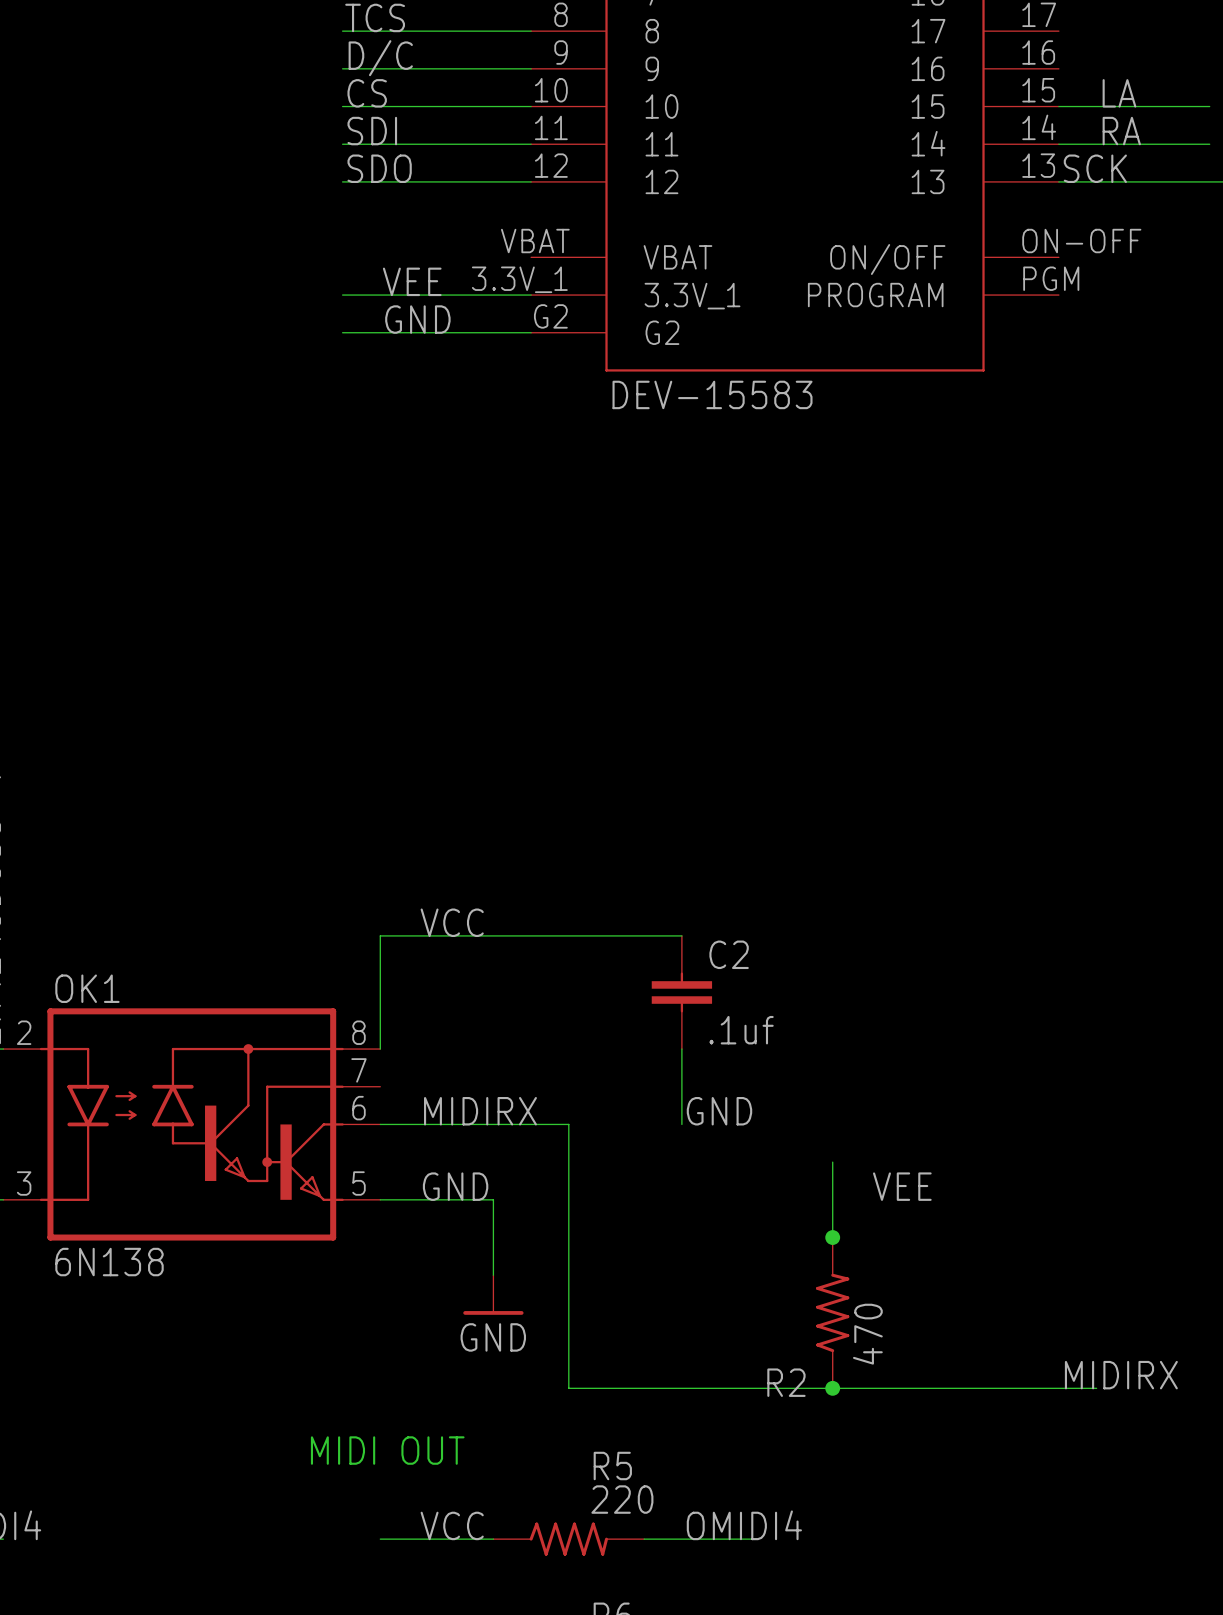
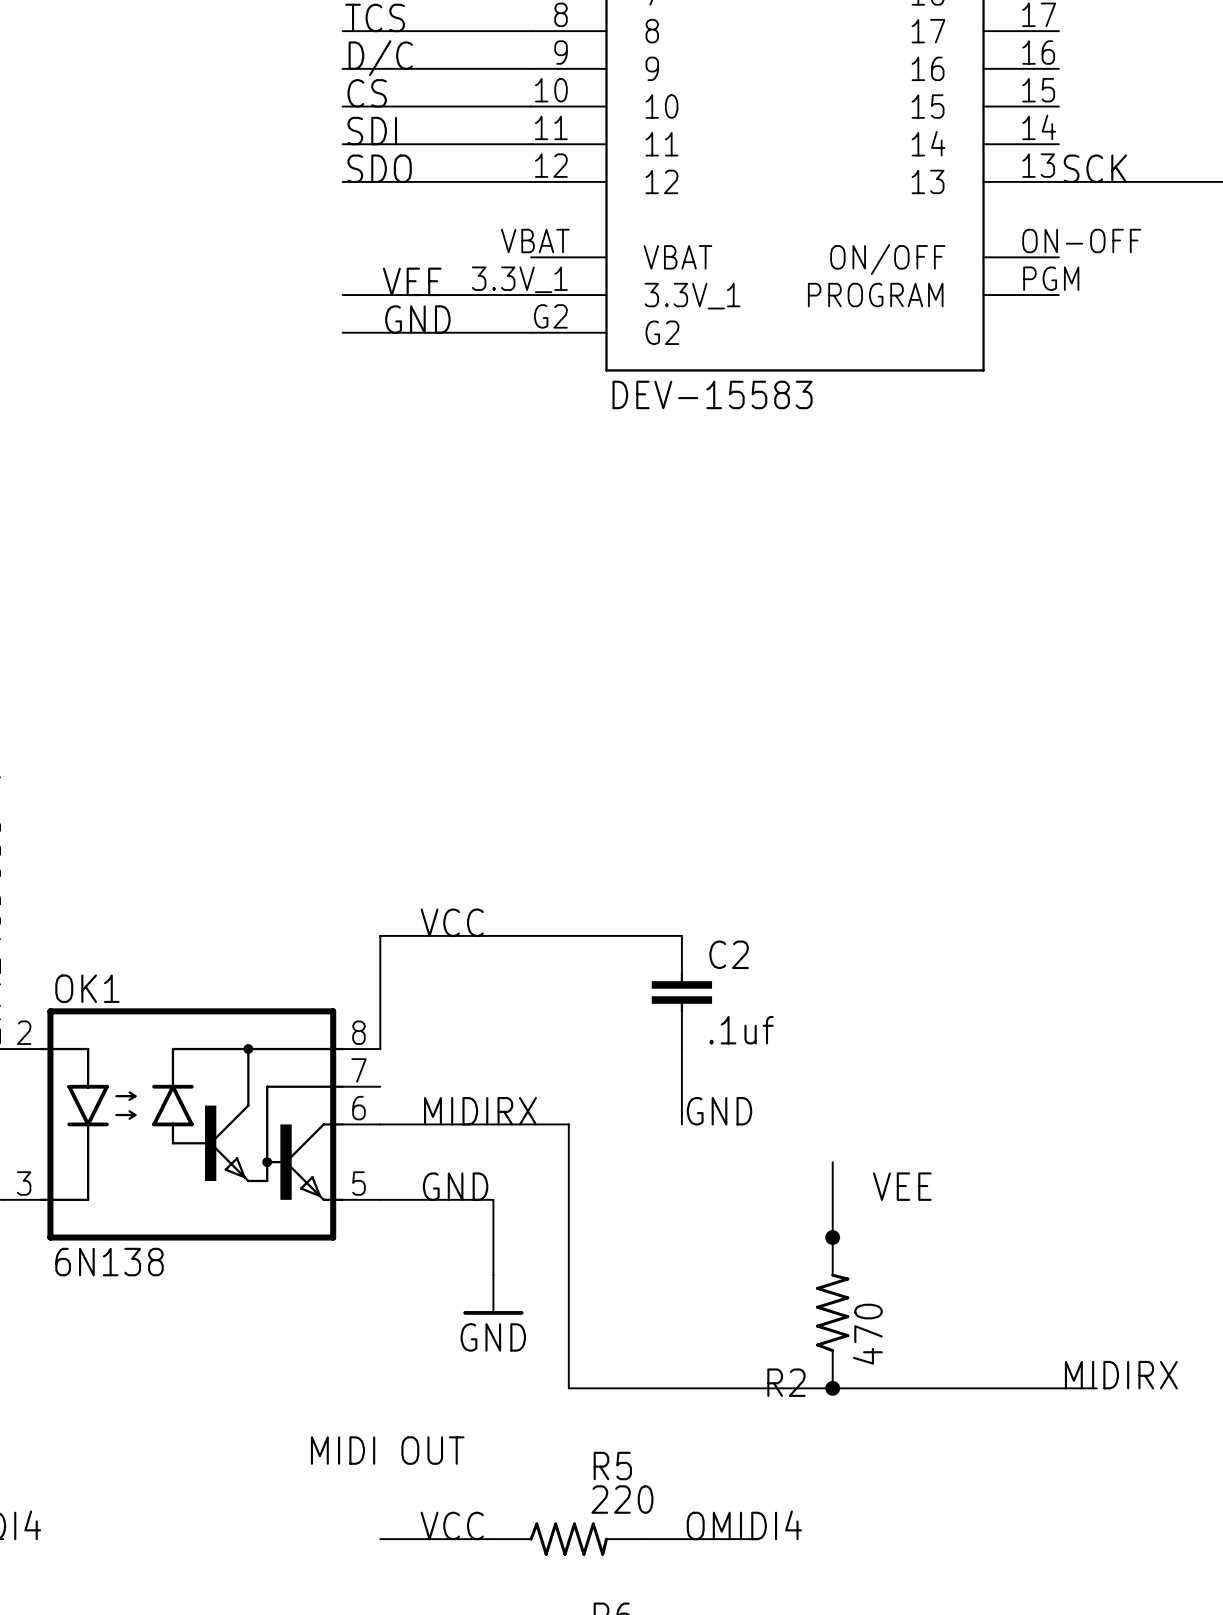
label: LA (1119, 93) -> none
wire: (1058, 106) (1209, 106) -> none
label: RA (1121, 131) -> none
wire: (1058, 144) (1209, 144) -> none

